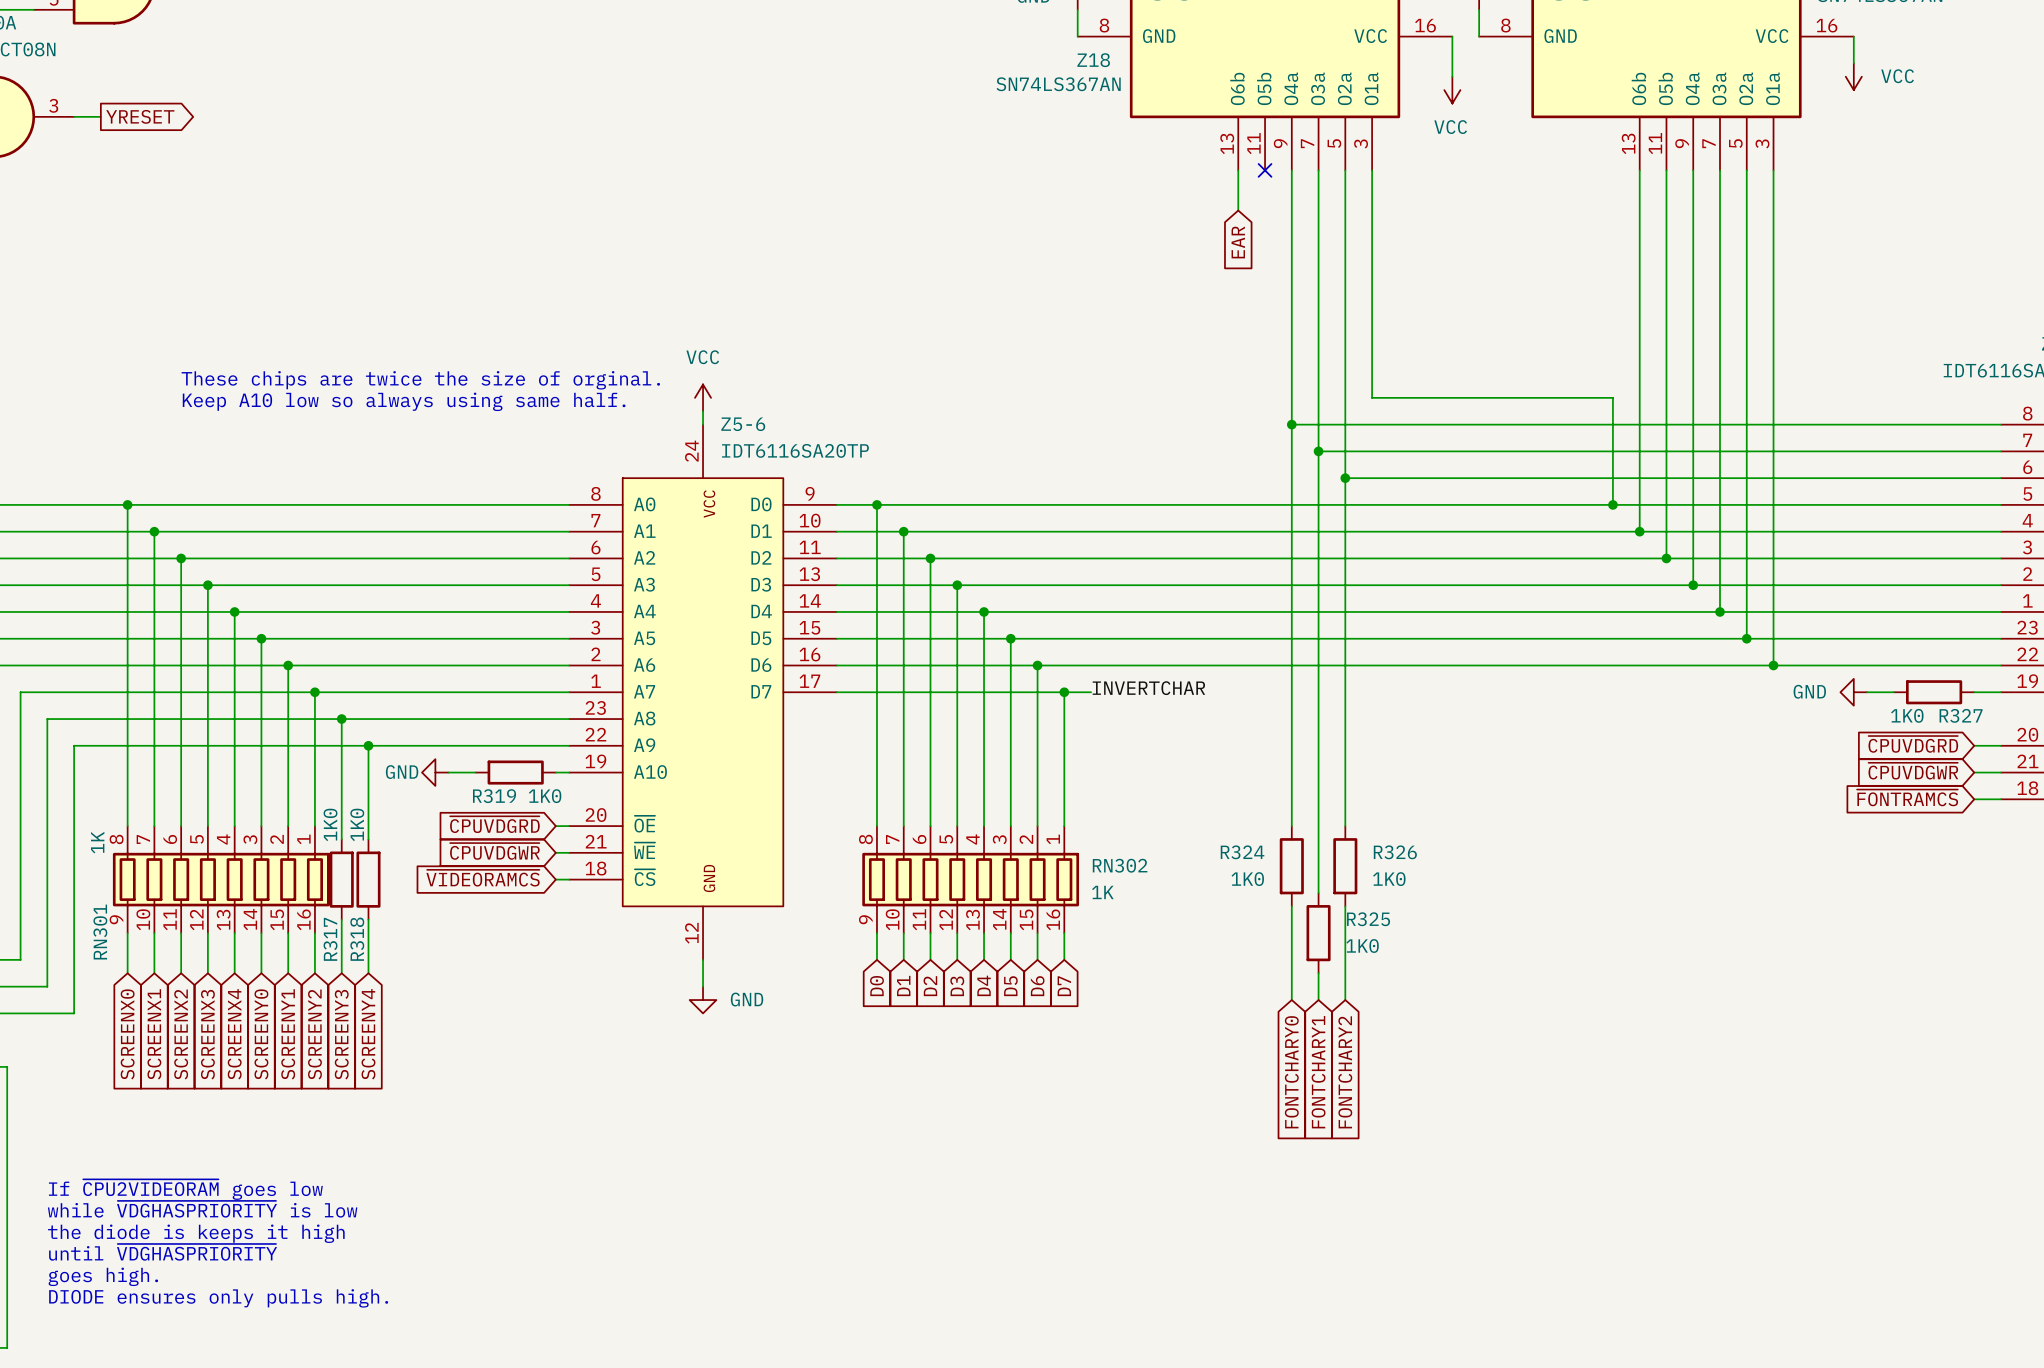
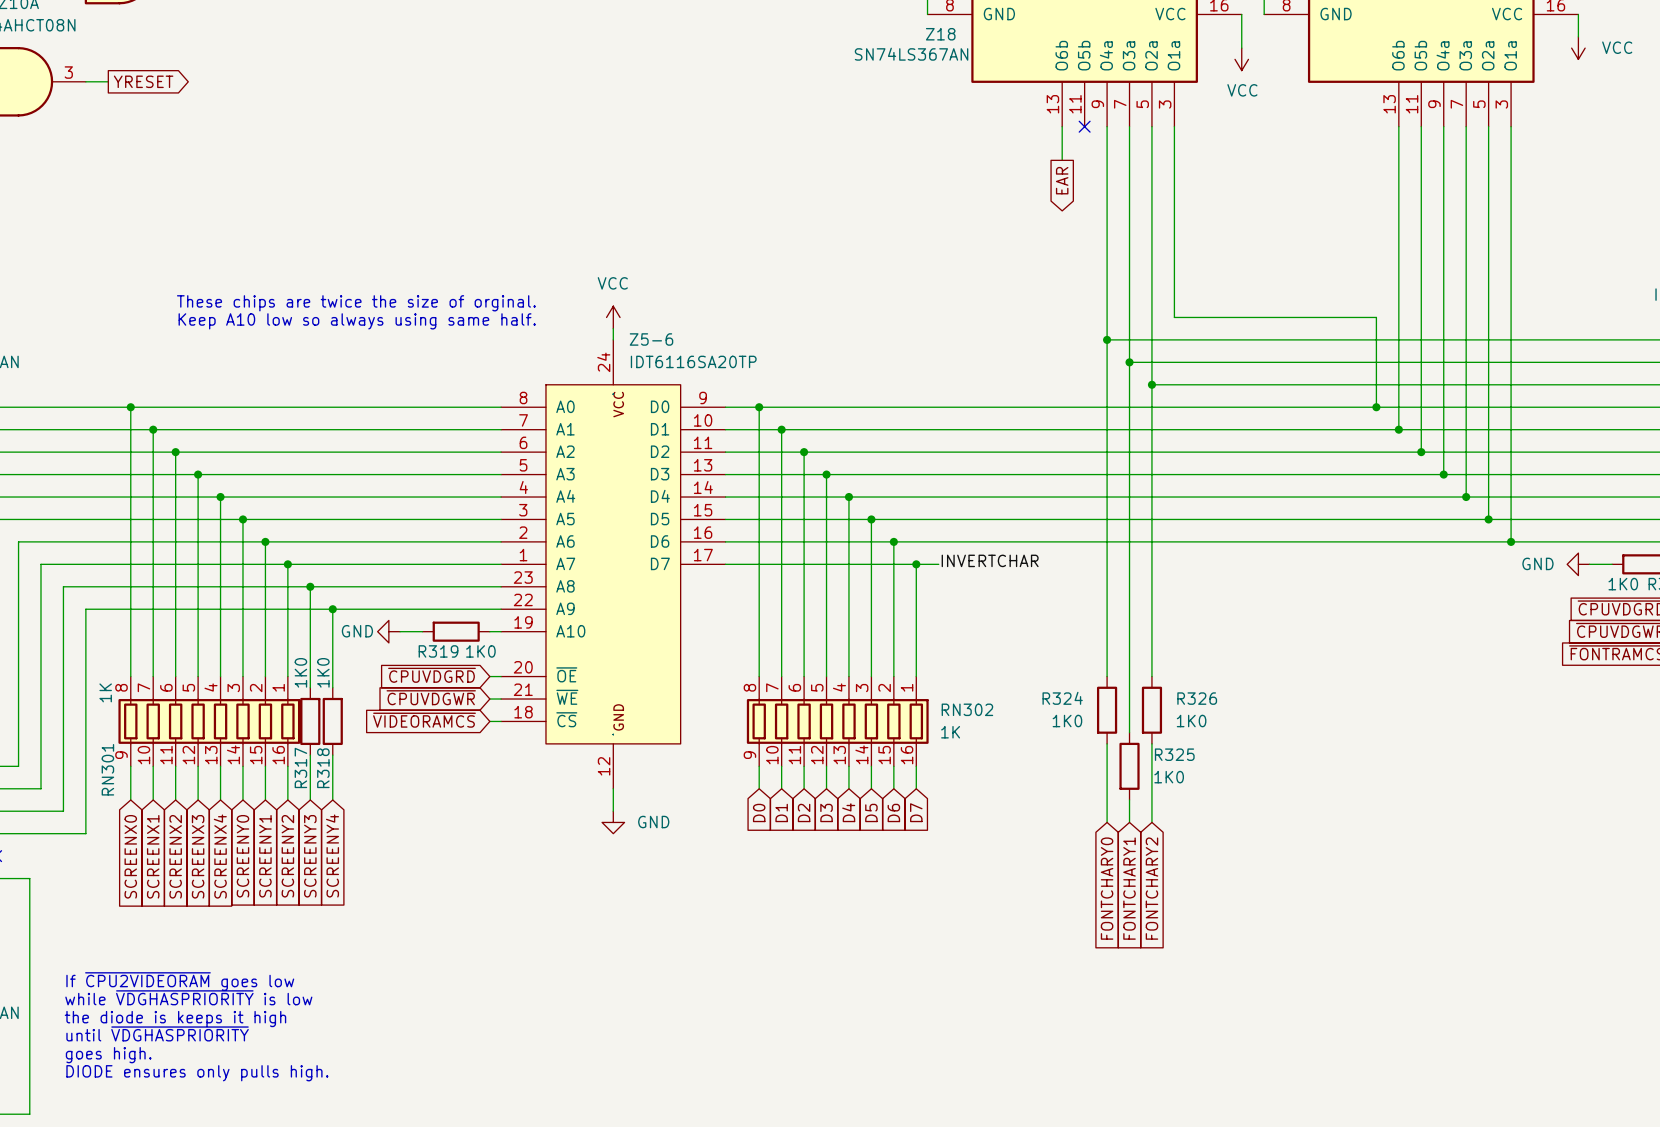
global label shape: input (1238, 242) -> output (1062, 180)

